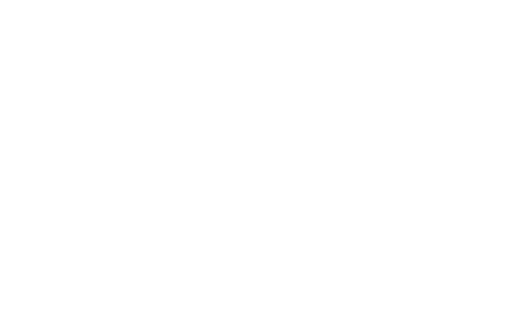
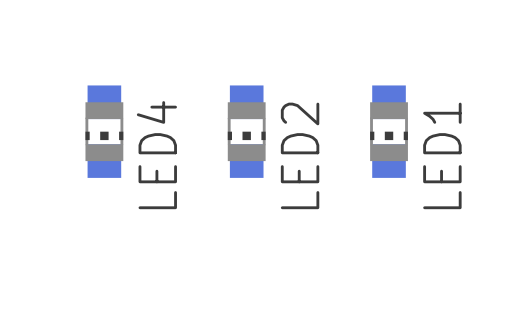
LED4: none -> (104, 131)
LED2: none -> (246, 131)
LED1: none -> (389, 131)

